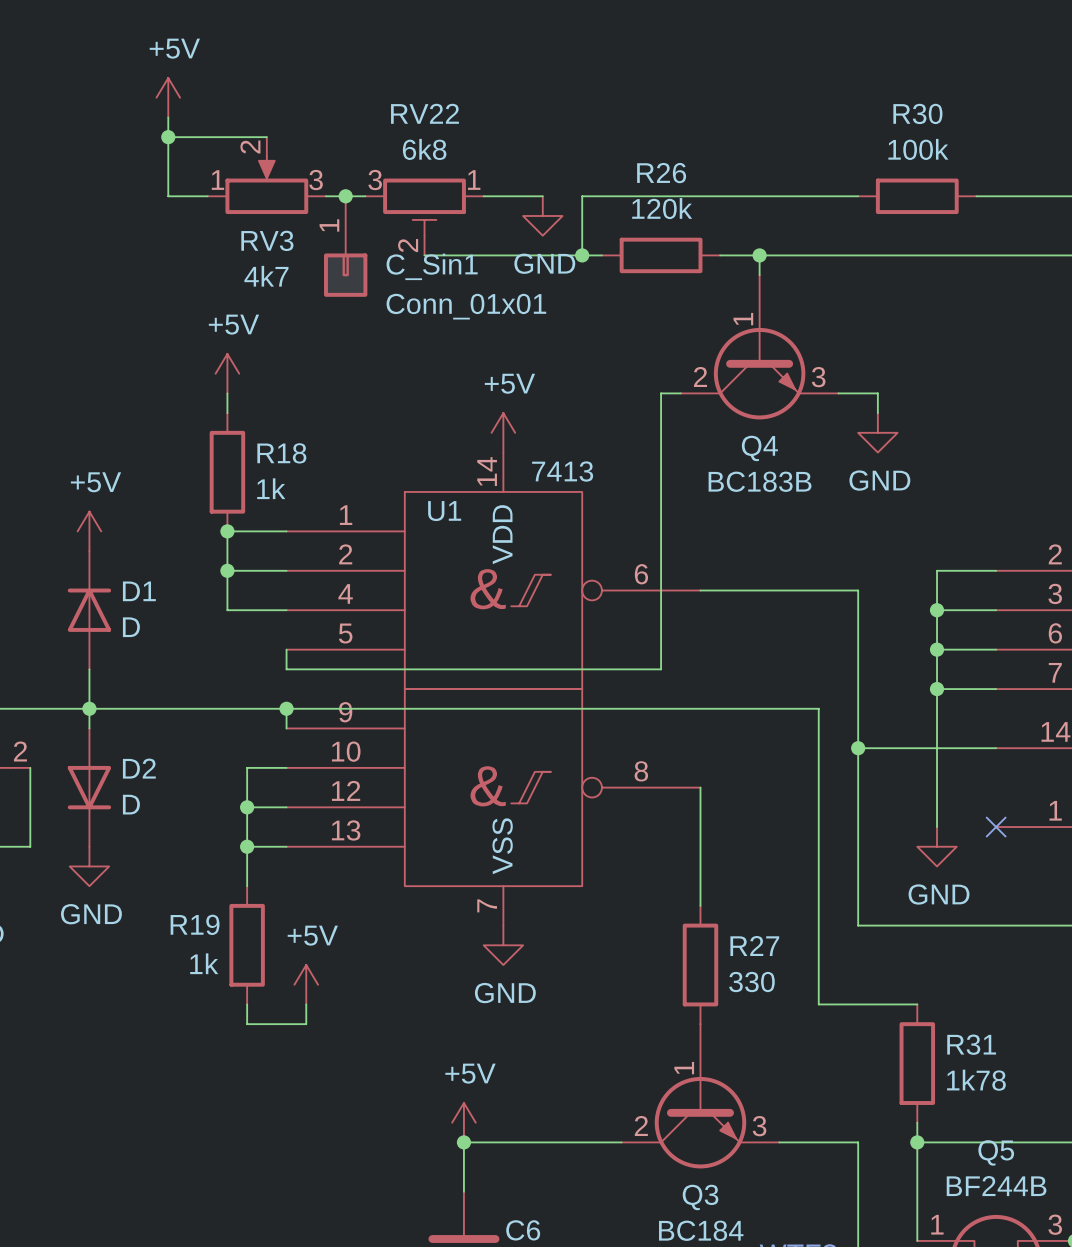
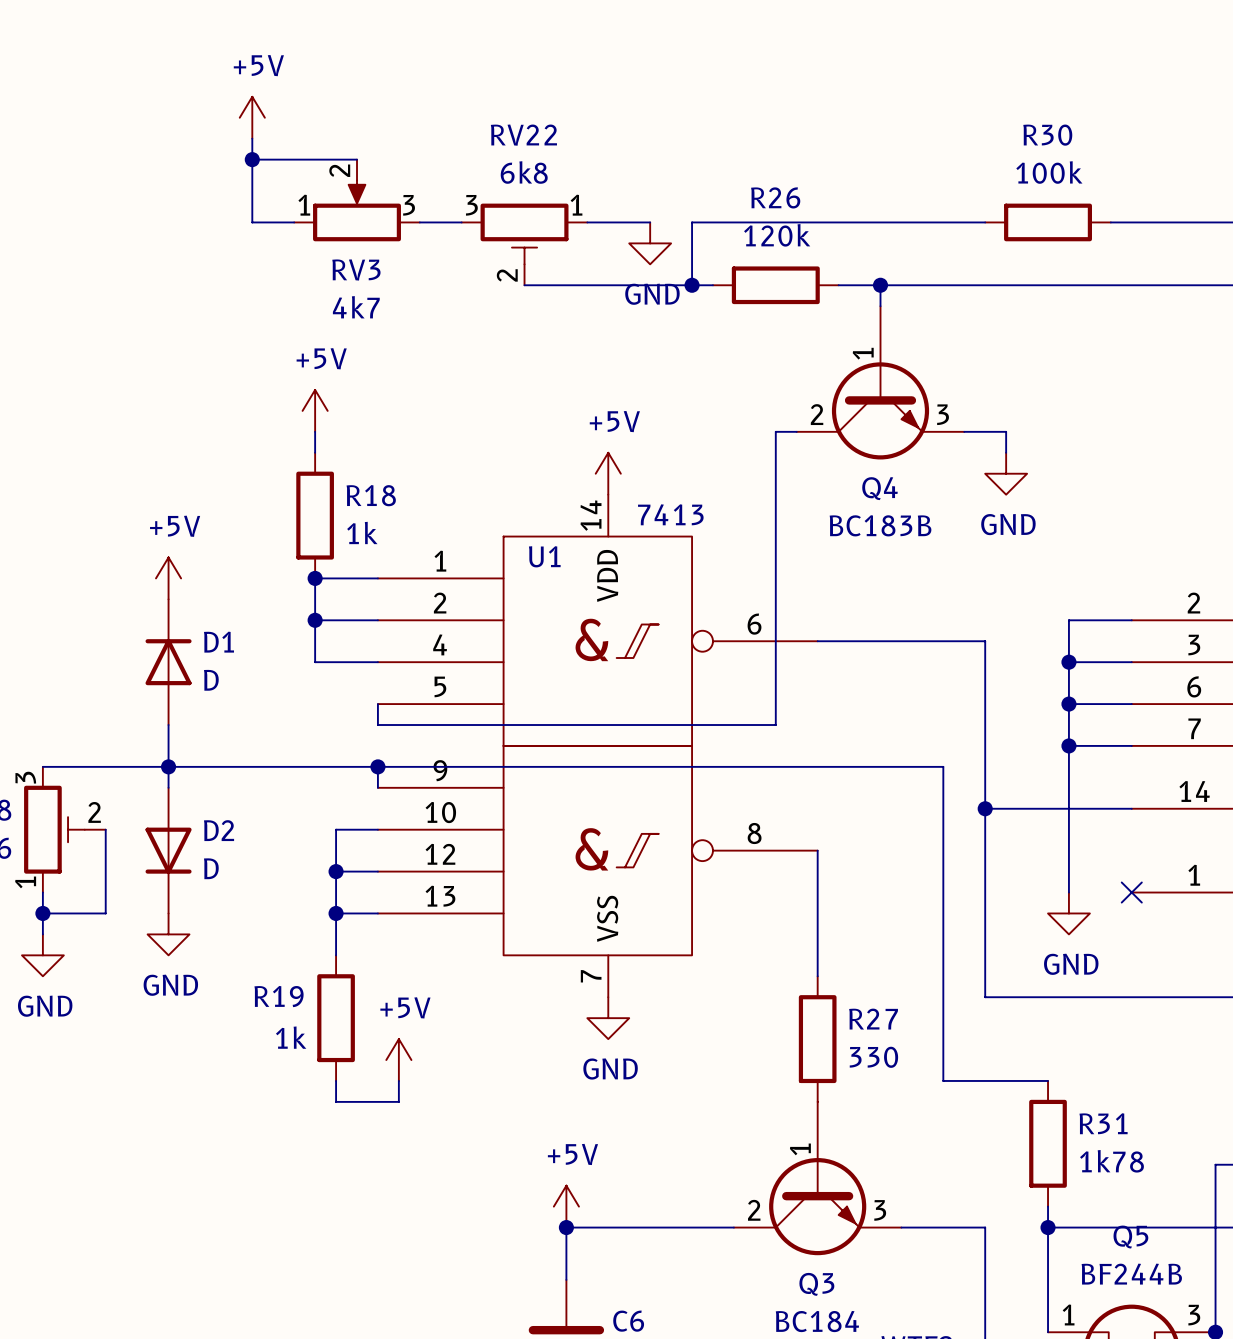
junction: (345, 196) -> none
C_Sin1: Conn_01x01 (345, 246) -> none

